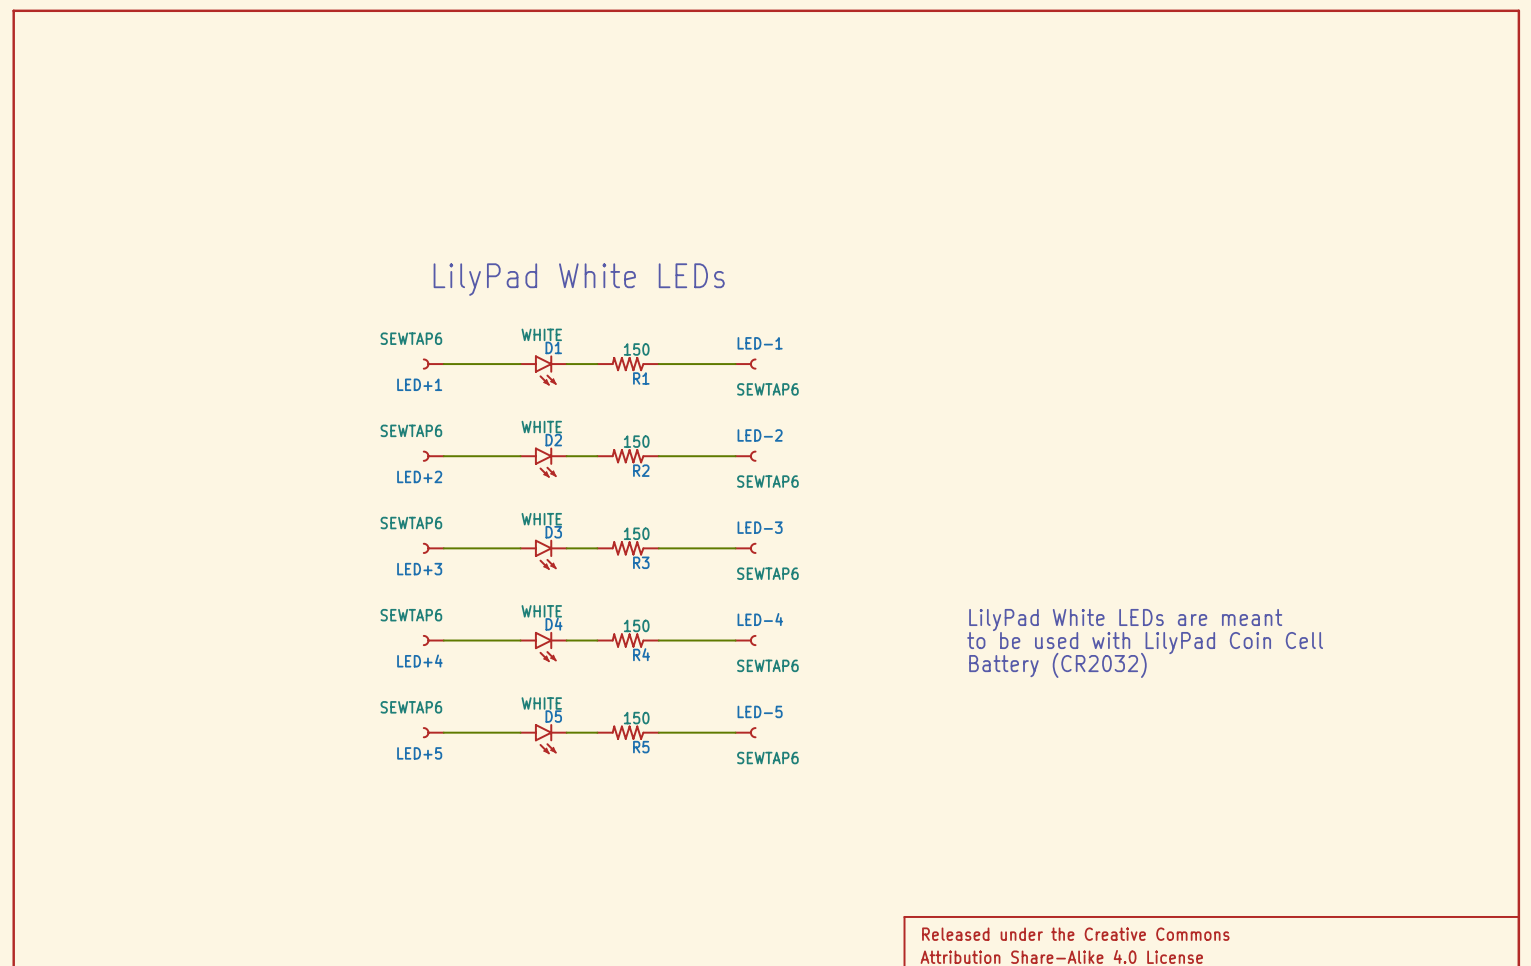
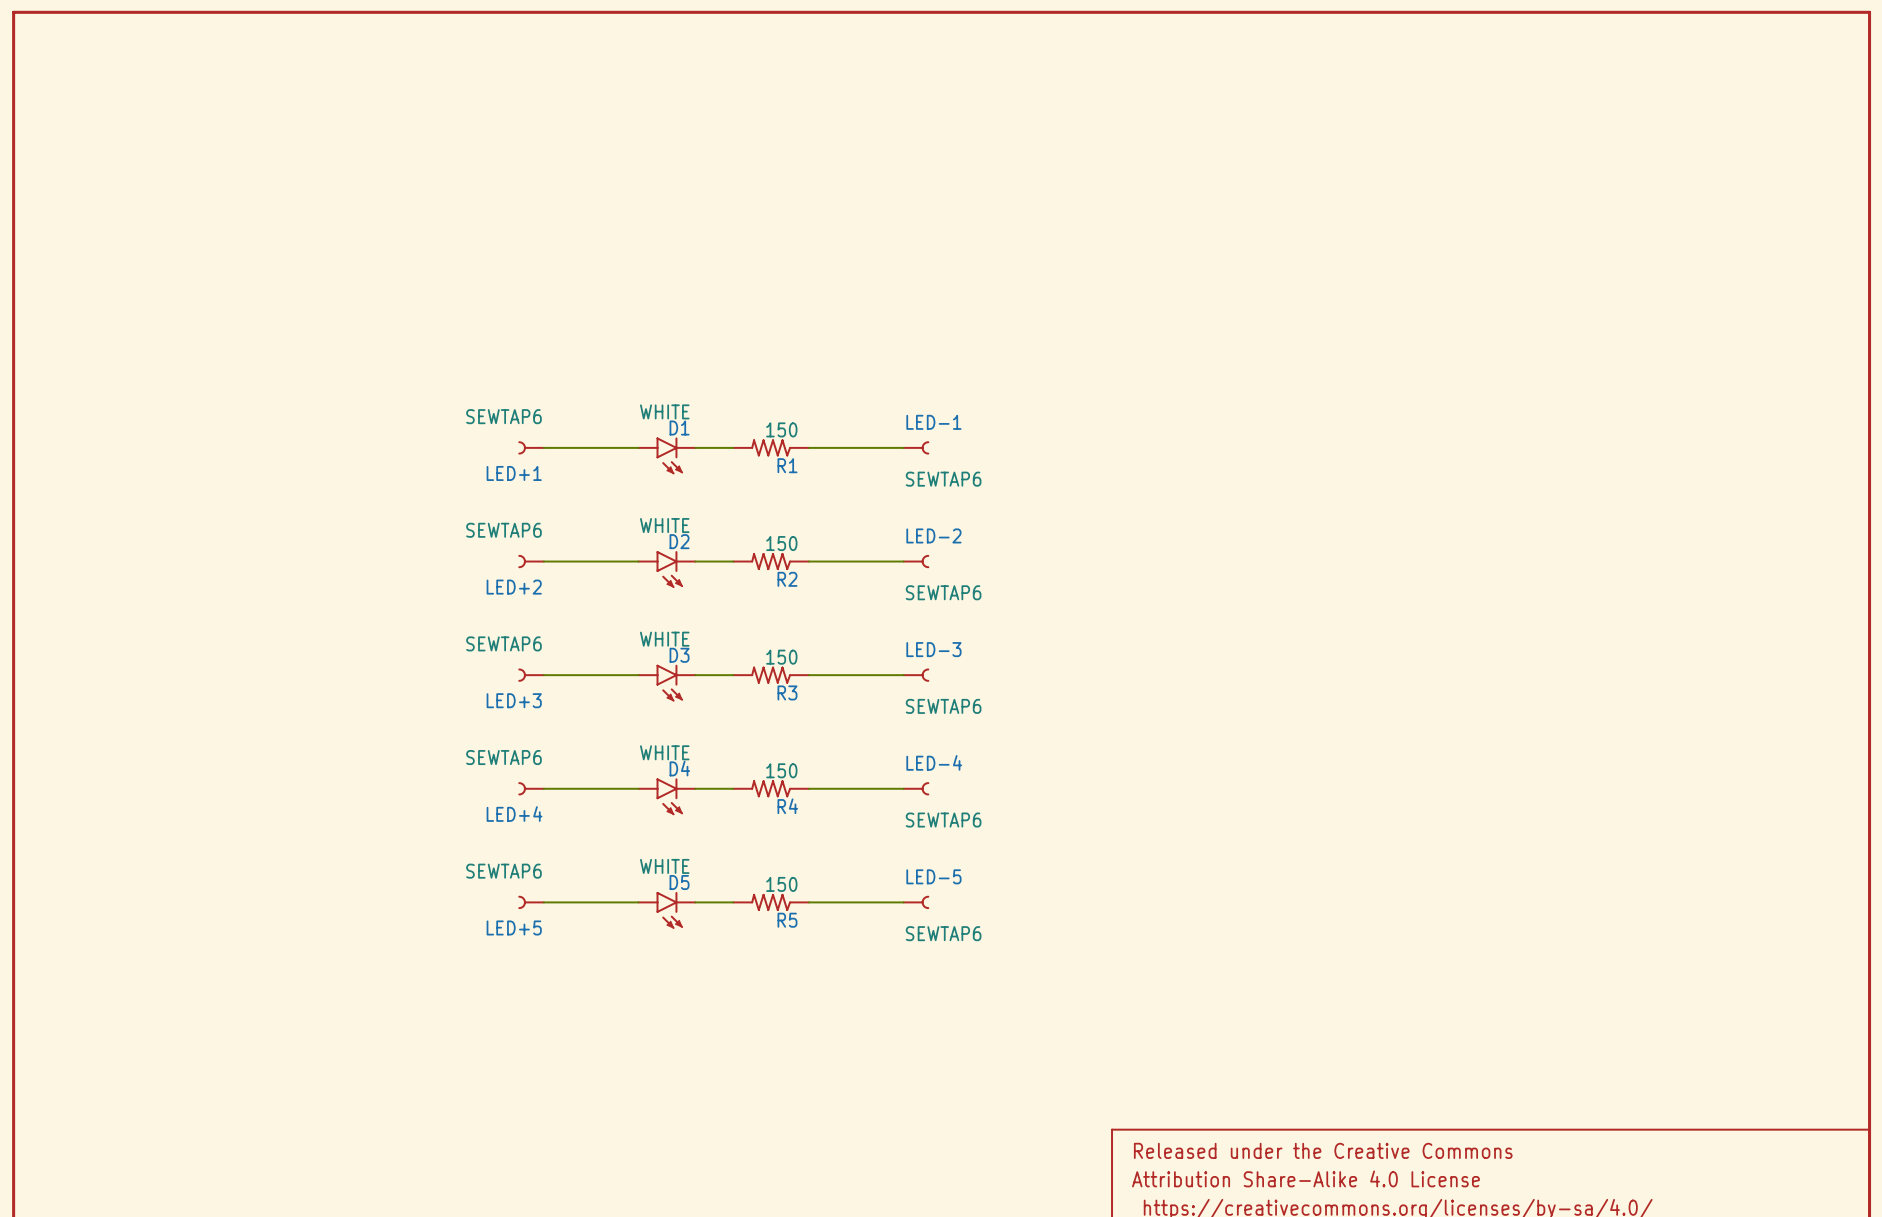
text: LilyPad White LEDs (579, 279) -> none
text: LilyPad White LEDs are meant (1125, 620) -> none
text: to be used with LilyPad Coin Cell (1145, 643) -> none
text: Battery (CR2032) (1057, 665) -> none

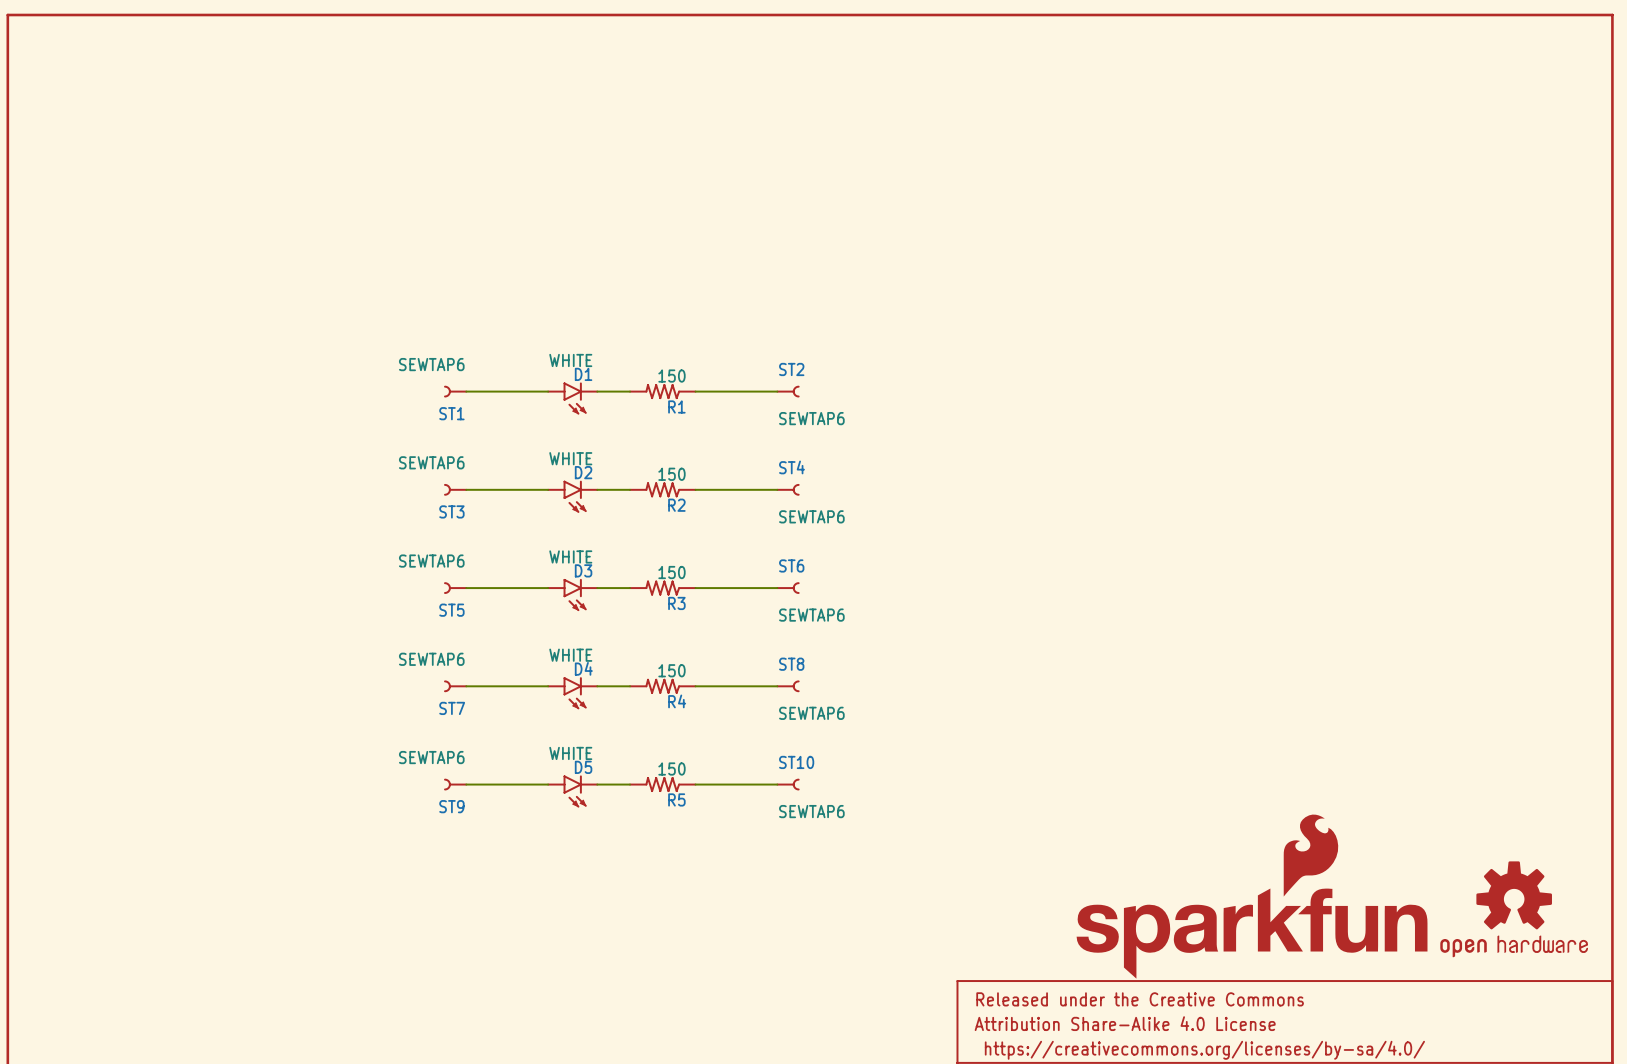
LED-1 name: LED-1 (933, 422) -> ST2 (791, 369)
LED+1 name: LED+1 (514, 473) -> ST1 (451, 413)
LED-2 name: LED-2 (933, 535) -> ST4 (791, 467)
LED+2 name: LED+2 (514, 587) -> ST3 (451, 511)
LED-3 name: LED-3 (933, 649) -> ST6 (791, 565)
LED+3 name: LED+3 (514, 700) -> ST5 (451, 610)
LED-4 name: LED-4 (934, 762) -> ST8 (791, 664)
LED+4 name: LED+4 (514, 814) -> ST7 (452, 708)
LED-5 name: LED-5 (933, 876) -> ST10 (796, 762)
LED+5 name: LED+5 (514, 927) -> ST9 (451, 806)
part: none -> (1252, 896)
part: none -> (1514, 909)

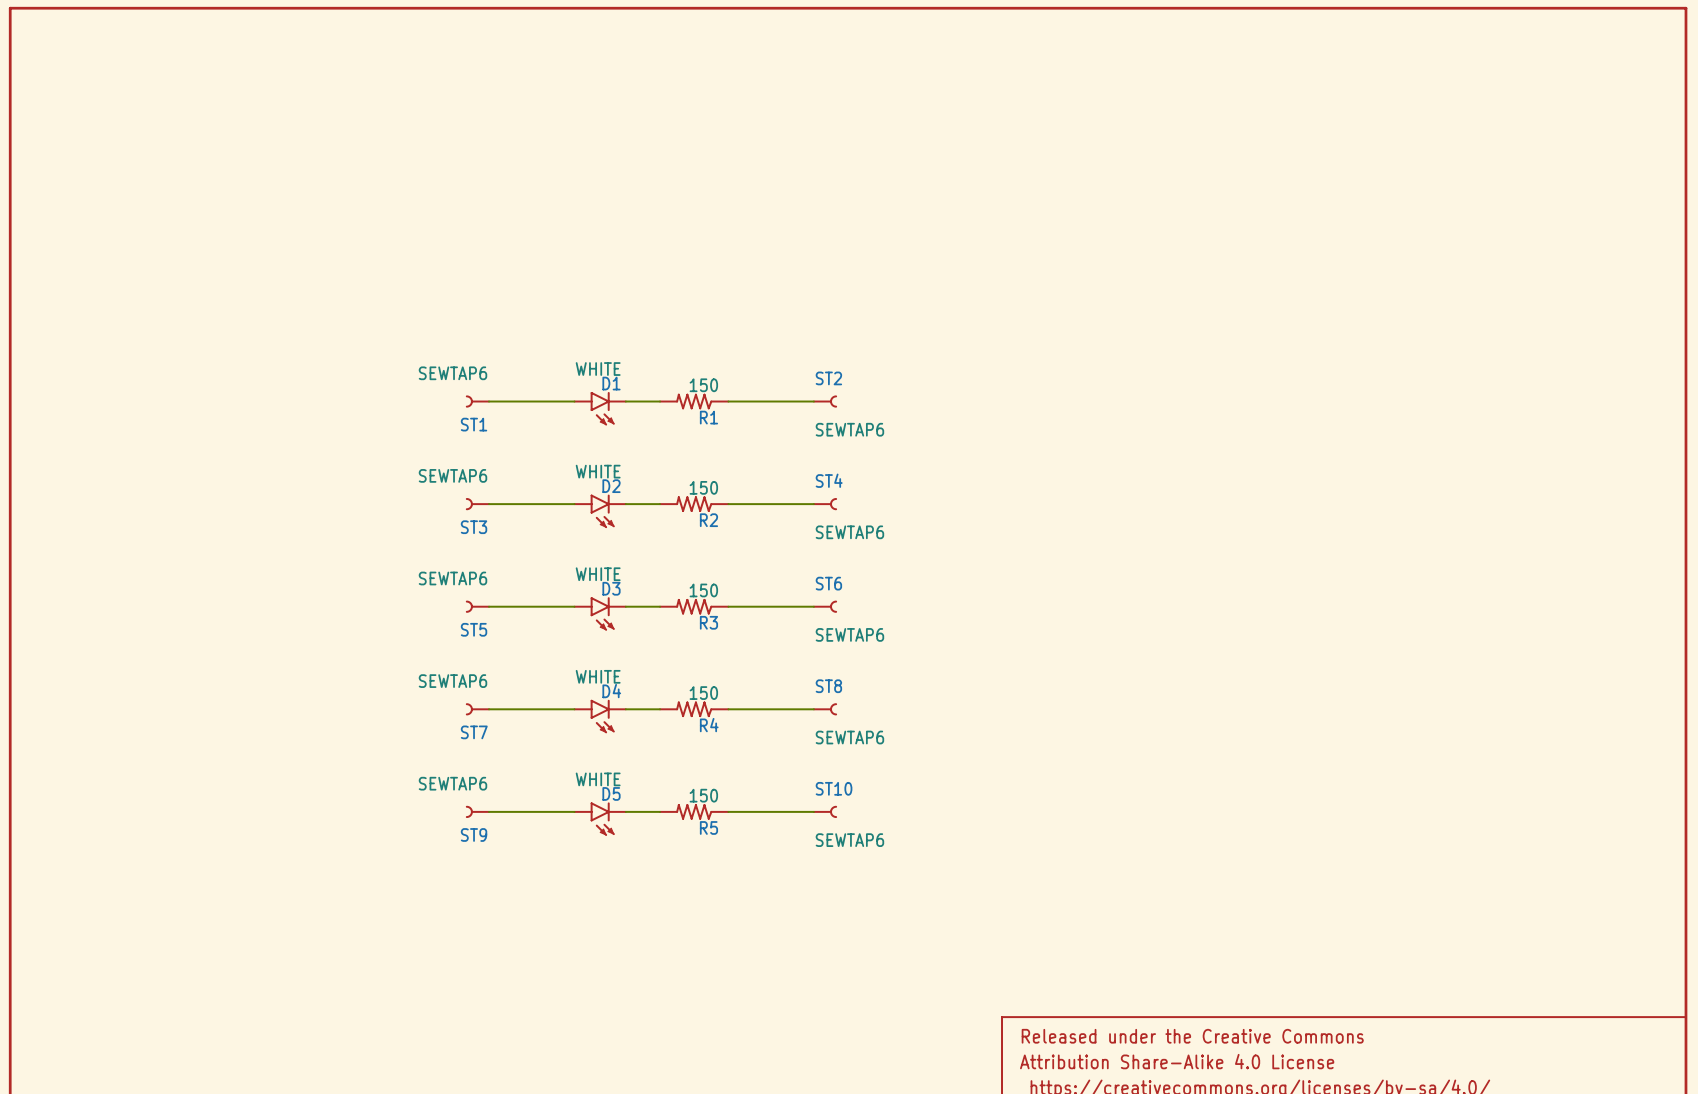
part: (1252, 896) -> none
part: (1514, 909) -> none

